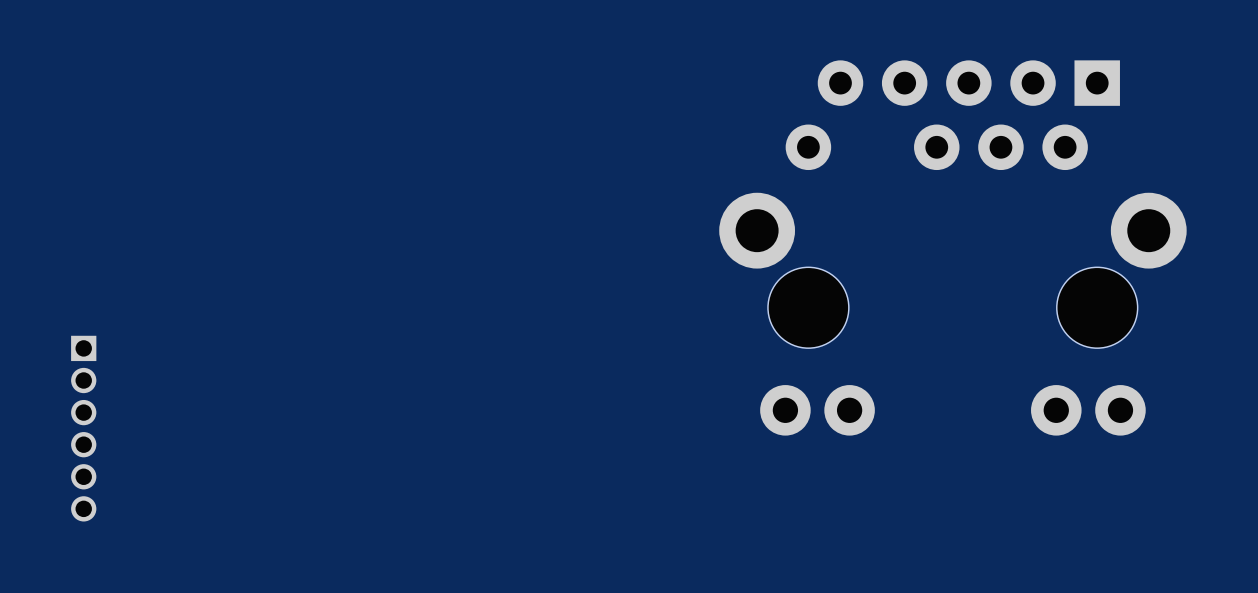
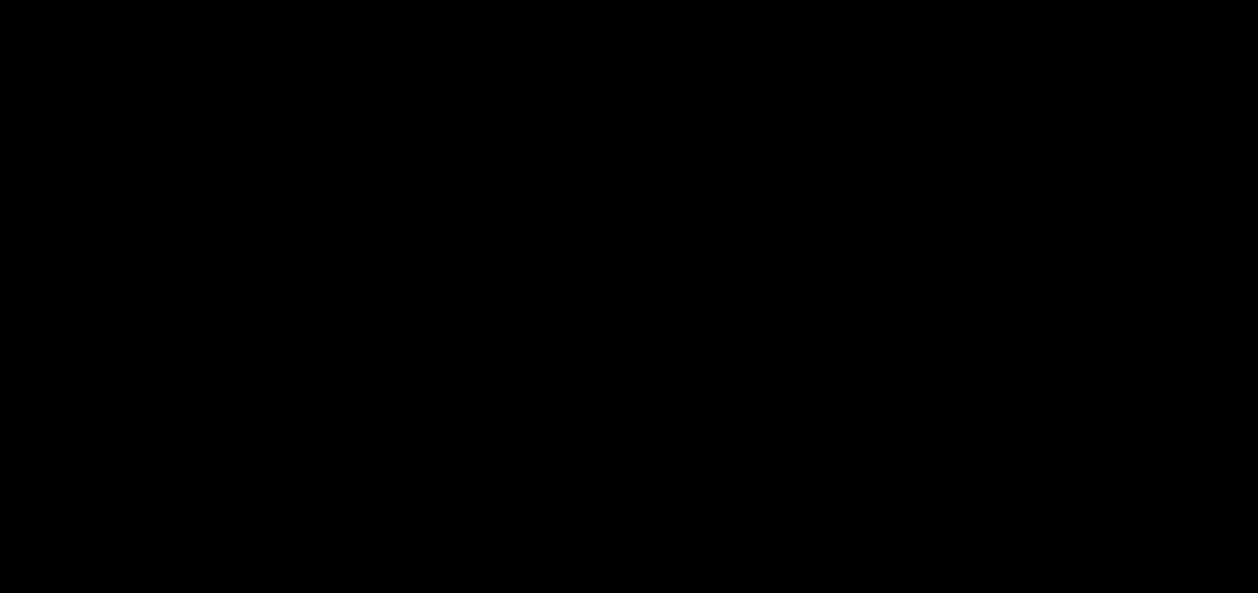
part: (952, 247) -> none
part: (83, 428) -> none

